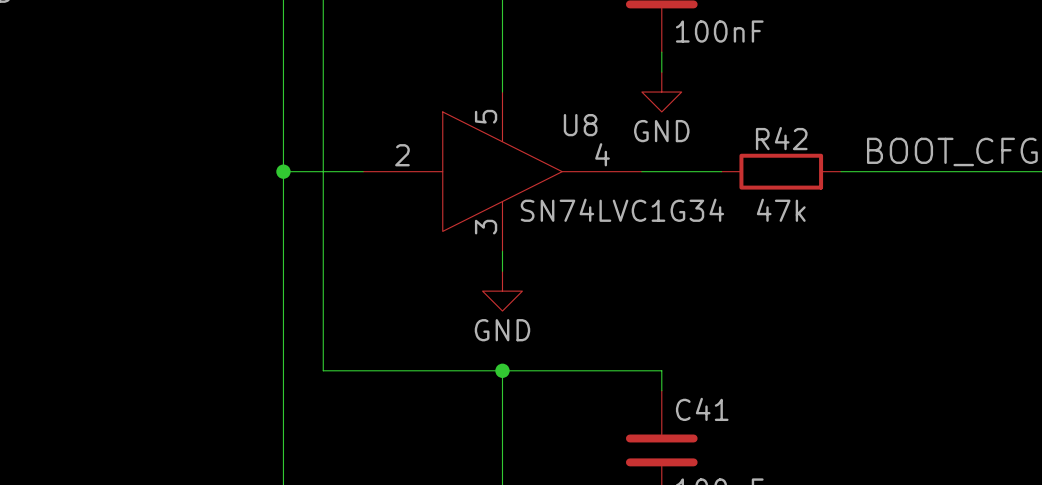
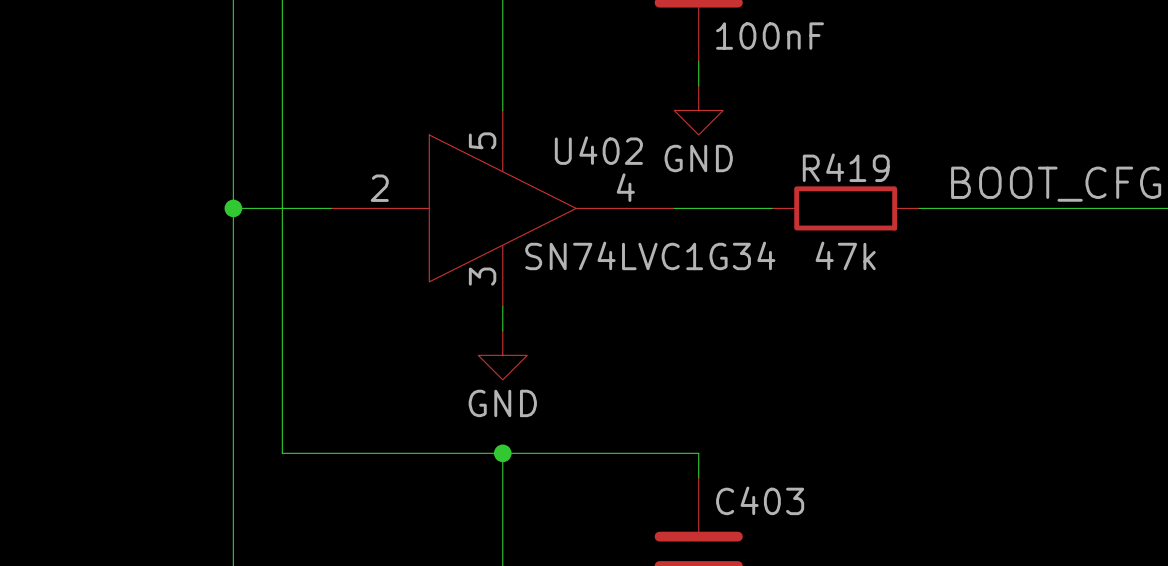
U8 name: U8 (580, 125) -> U402 (598, 150)
R42 name: R42 (781, 138) -> R419 (846, 167)
C41 name: C41 (702, 409) -> C403 (760, 500)

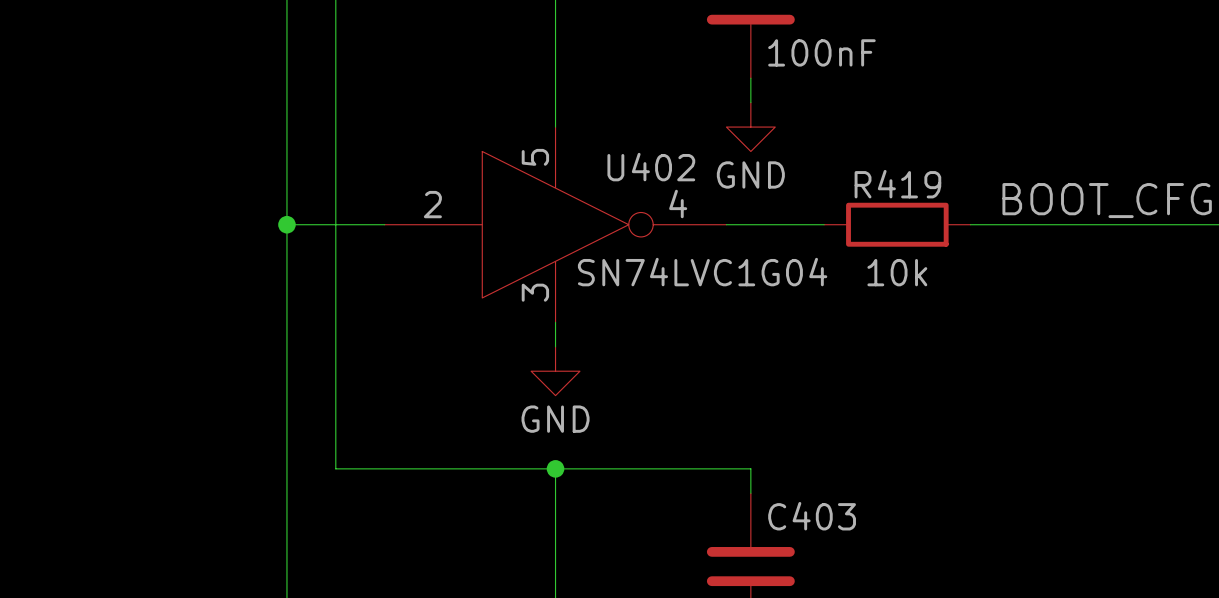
U402 symbol: [331, 110, 675, 307] -> [384, 127, 727, 323]
U402 value: SN74LVC1G34 (650, 255) -> SN74LVC1G04 (702, 272)
R419 value: 47k (845, 255) -> 10k (897, 272)

